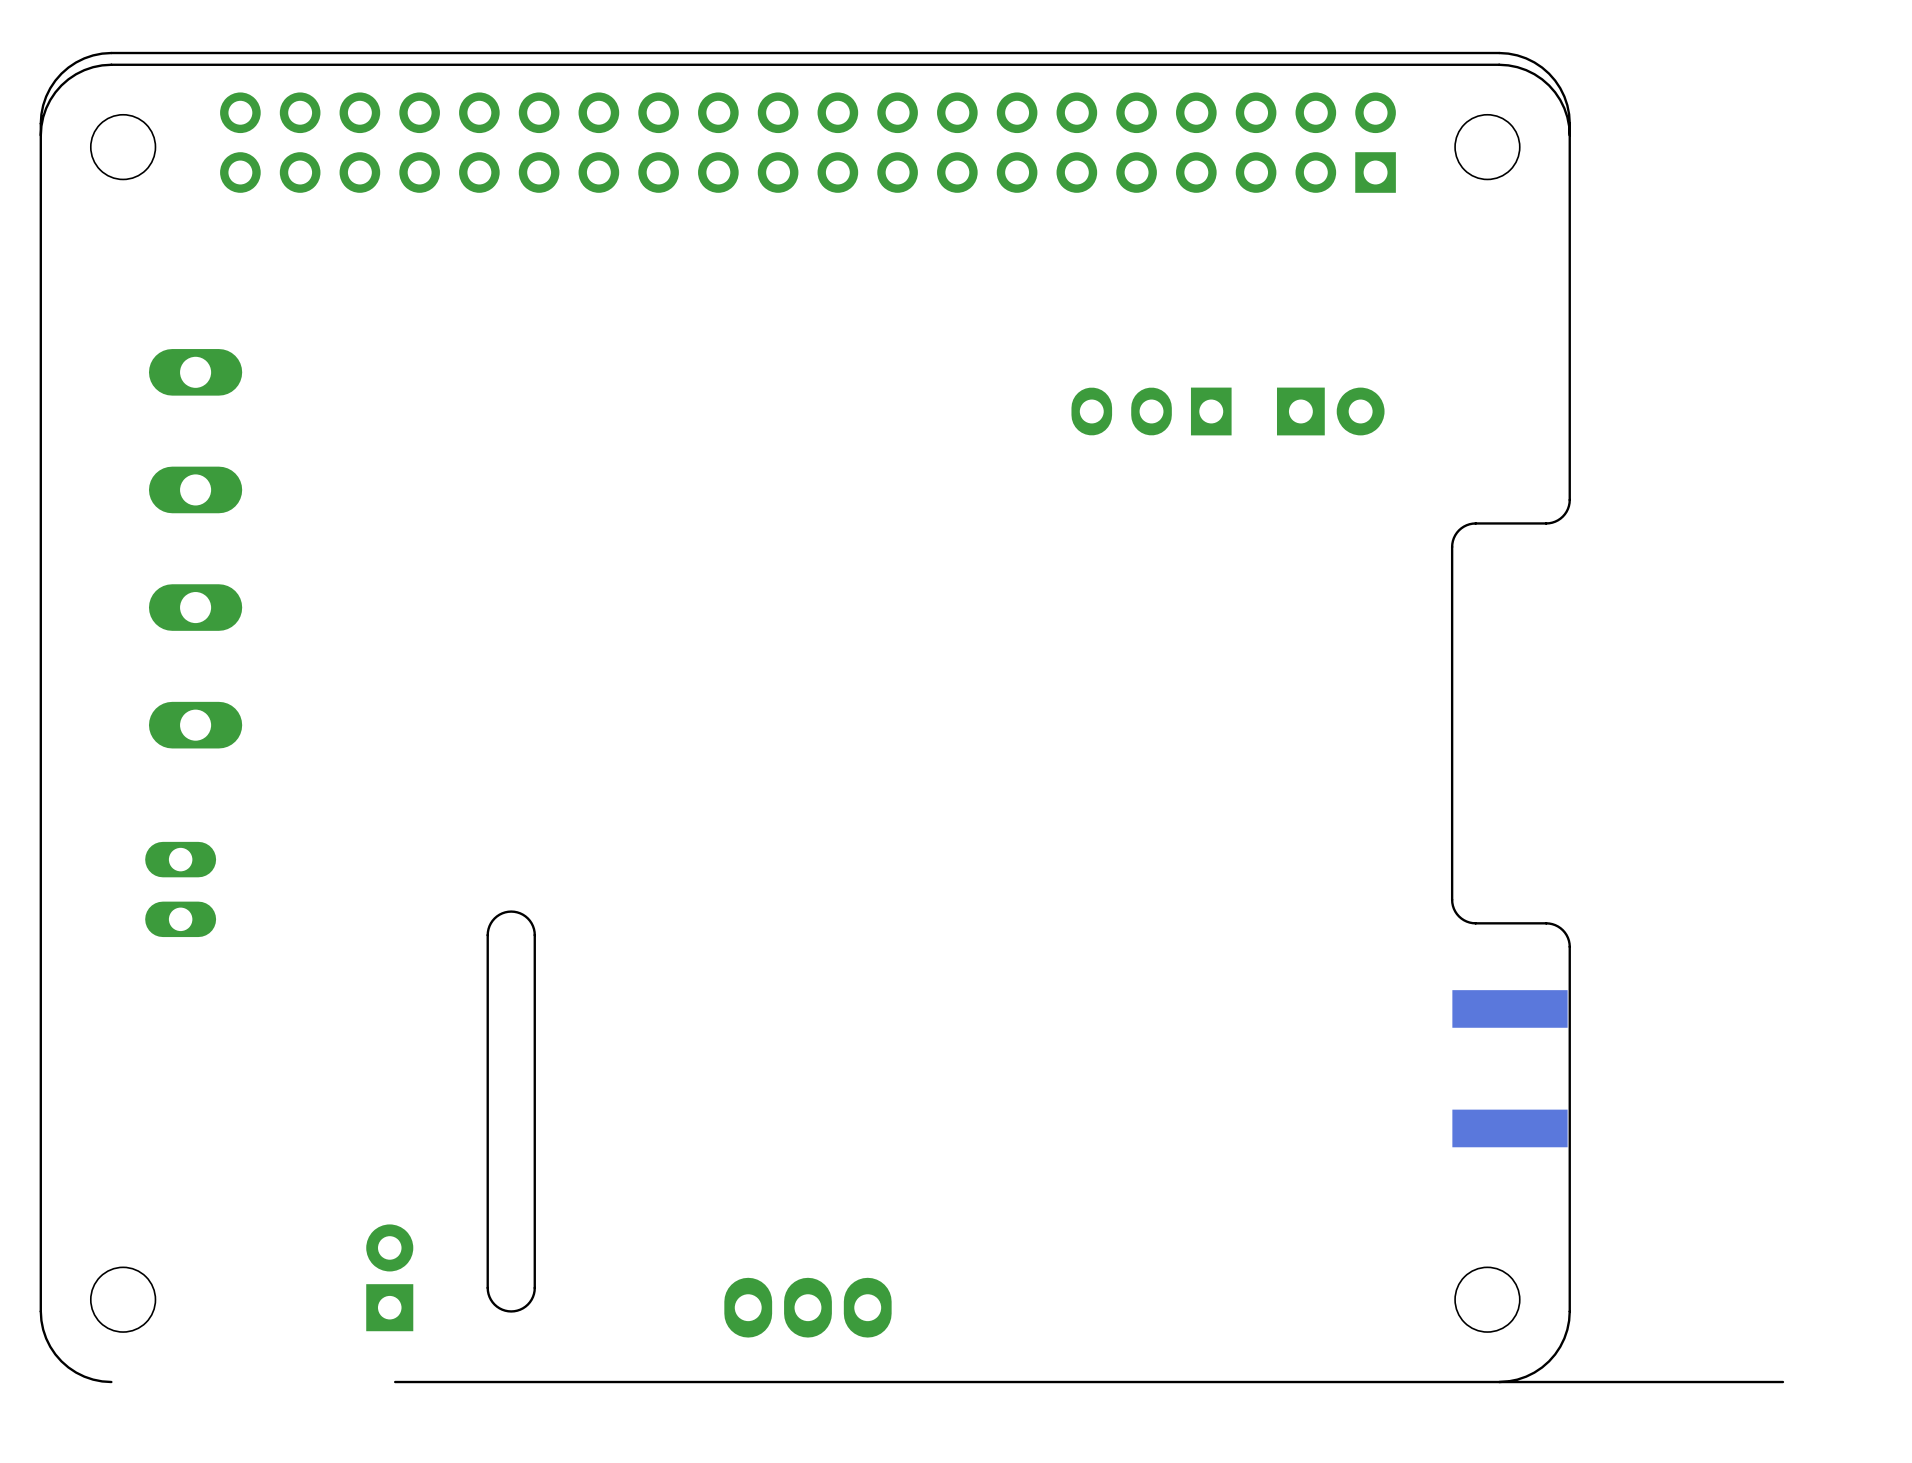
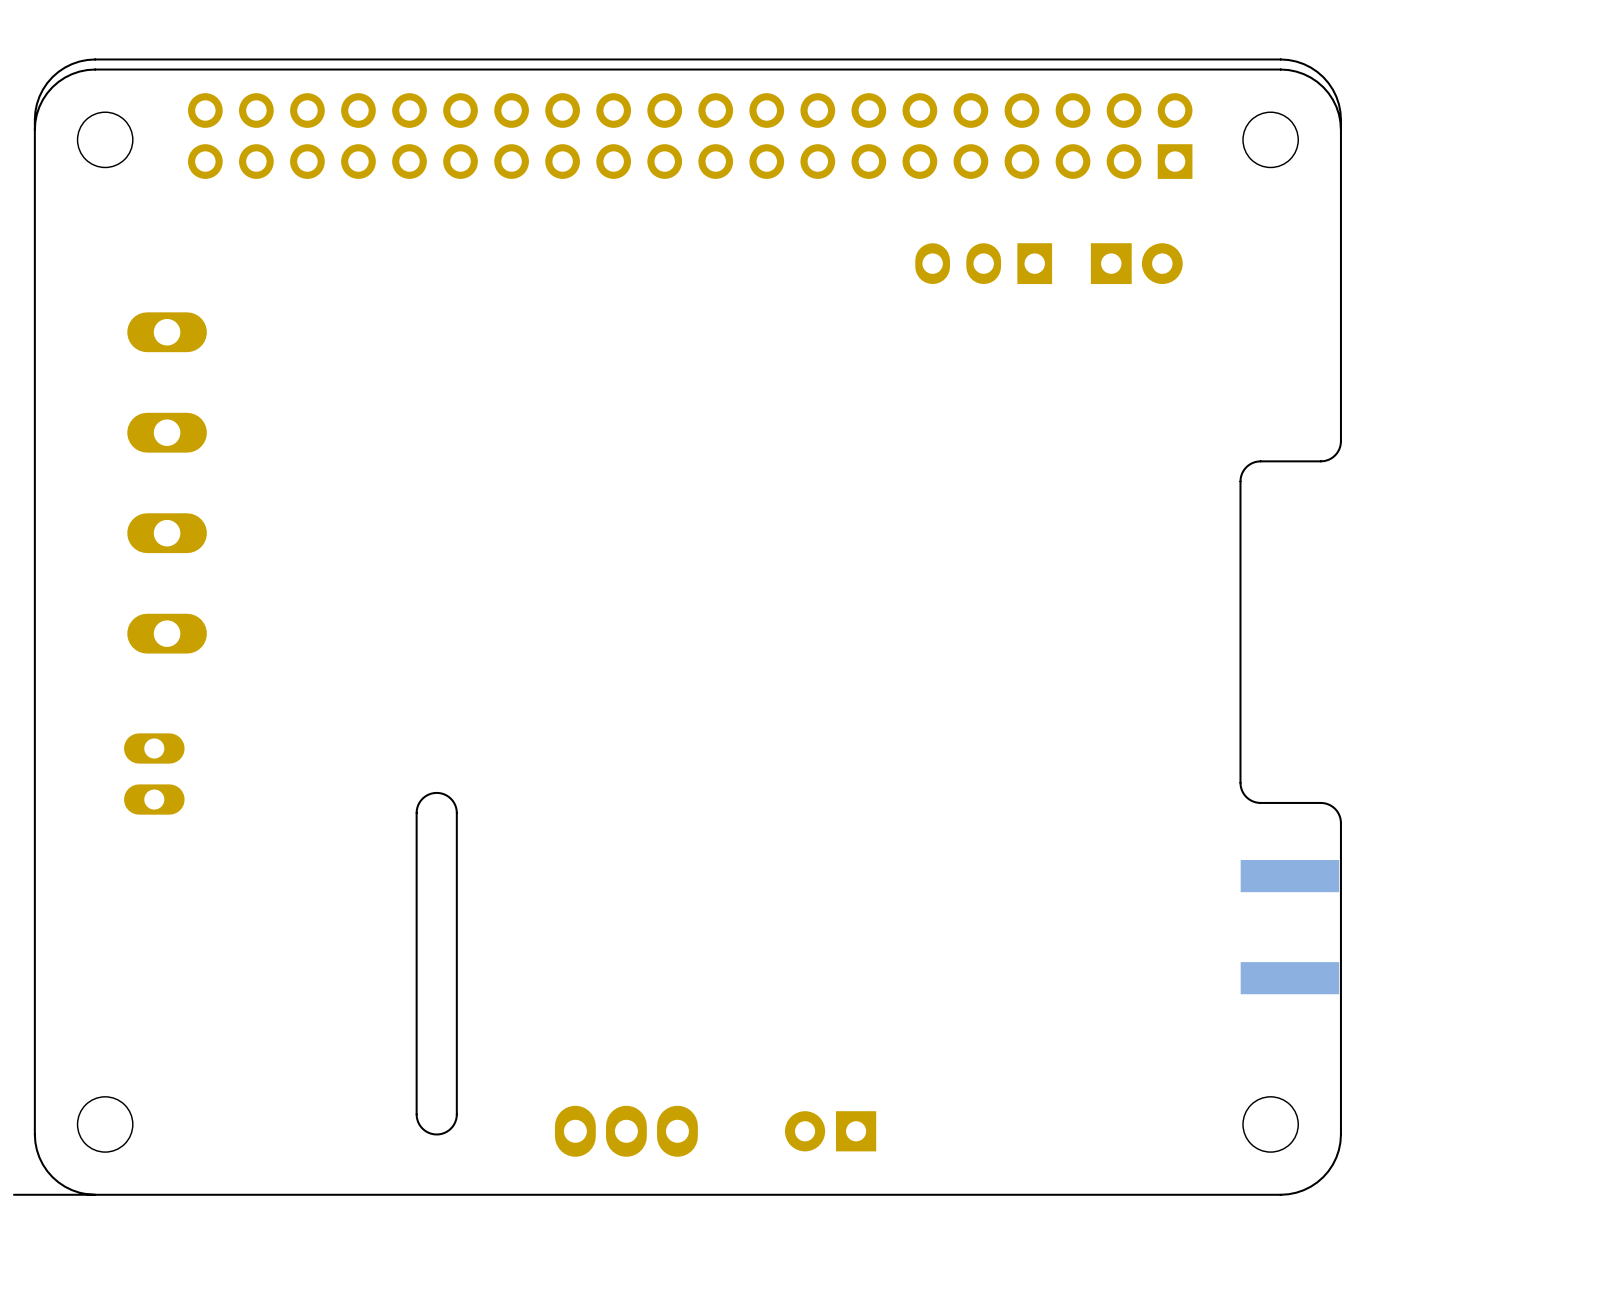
part position: (1151, 411) -> (983, 263)
part position: (1330, 411) -> (1136, 263)
part rotation: 0° (389, 1277) -> 90° counterclockwise (830, 1131)
part position: (389, 1277) -> (830, 1131)
part position: (807, 1307) -> (626, 1131)
board edge: none -> (337, 1194) (13, 1194)
board edge: (1782, 1382) (1499, 1382) -> none

